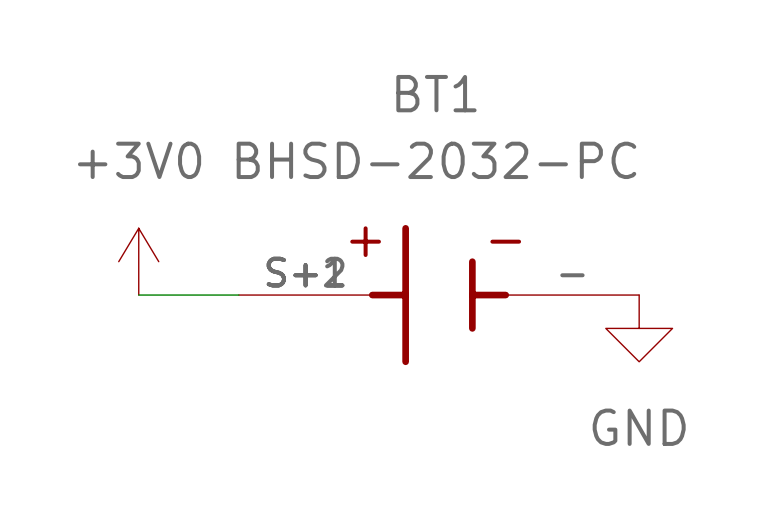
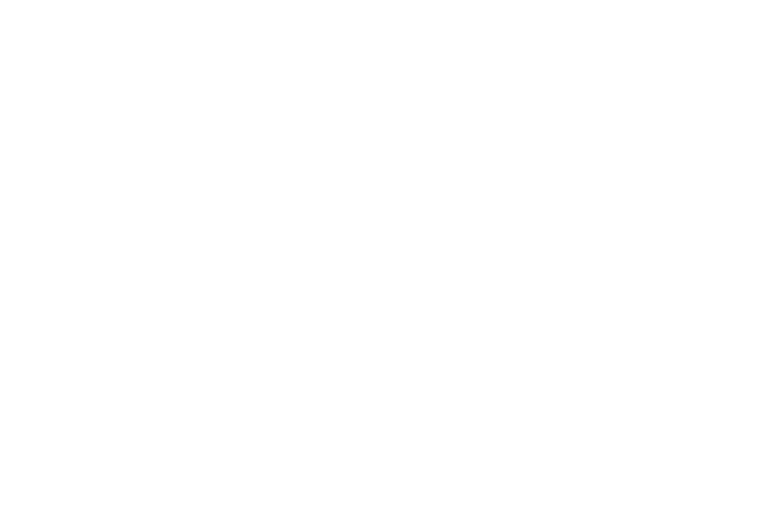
power symbol: +3V0 (138, 261) -> none
wire: (138, 295) (238, 295) -> none
BT1: BHSD-2032-PC (439, 295) -> none
power symbol: GND (639, 328) -> none

